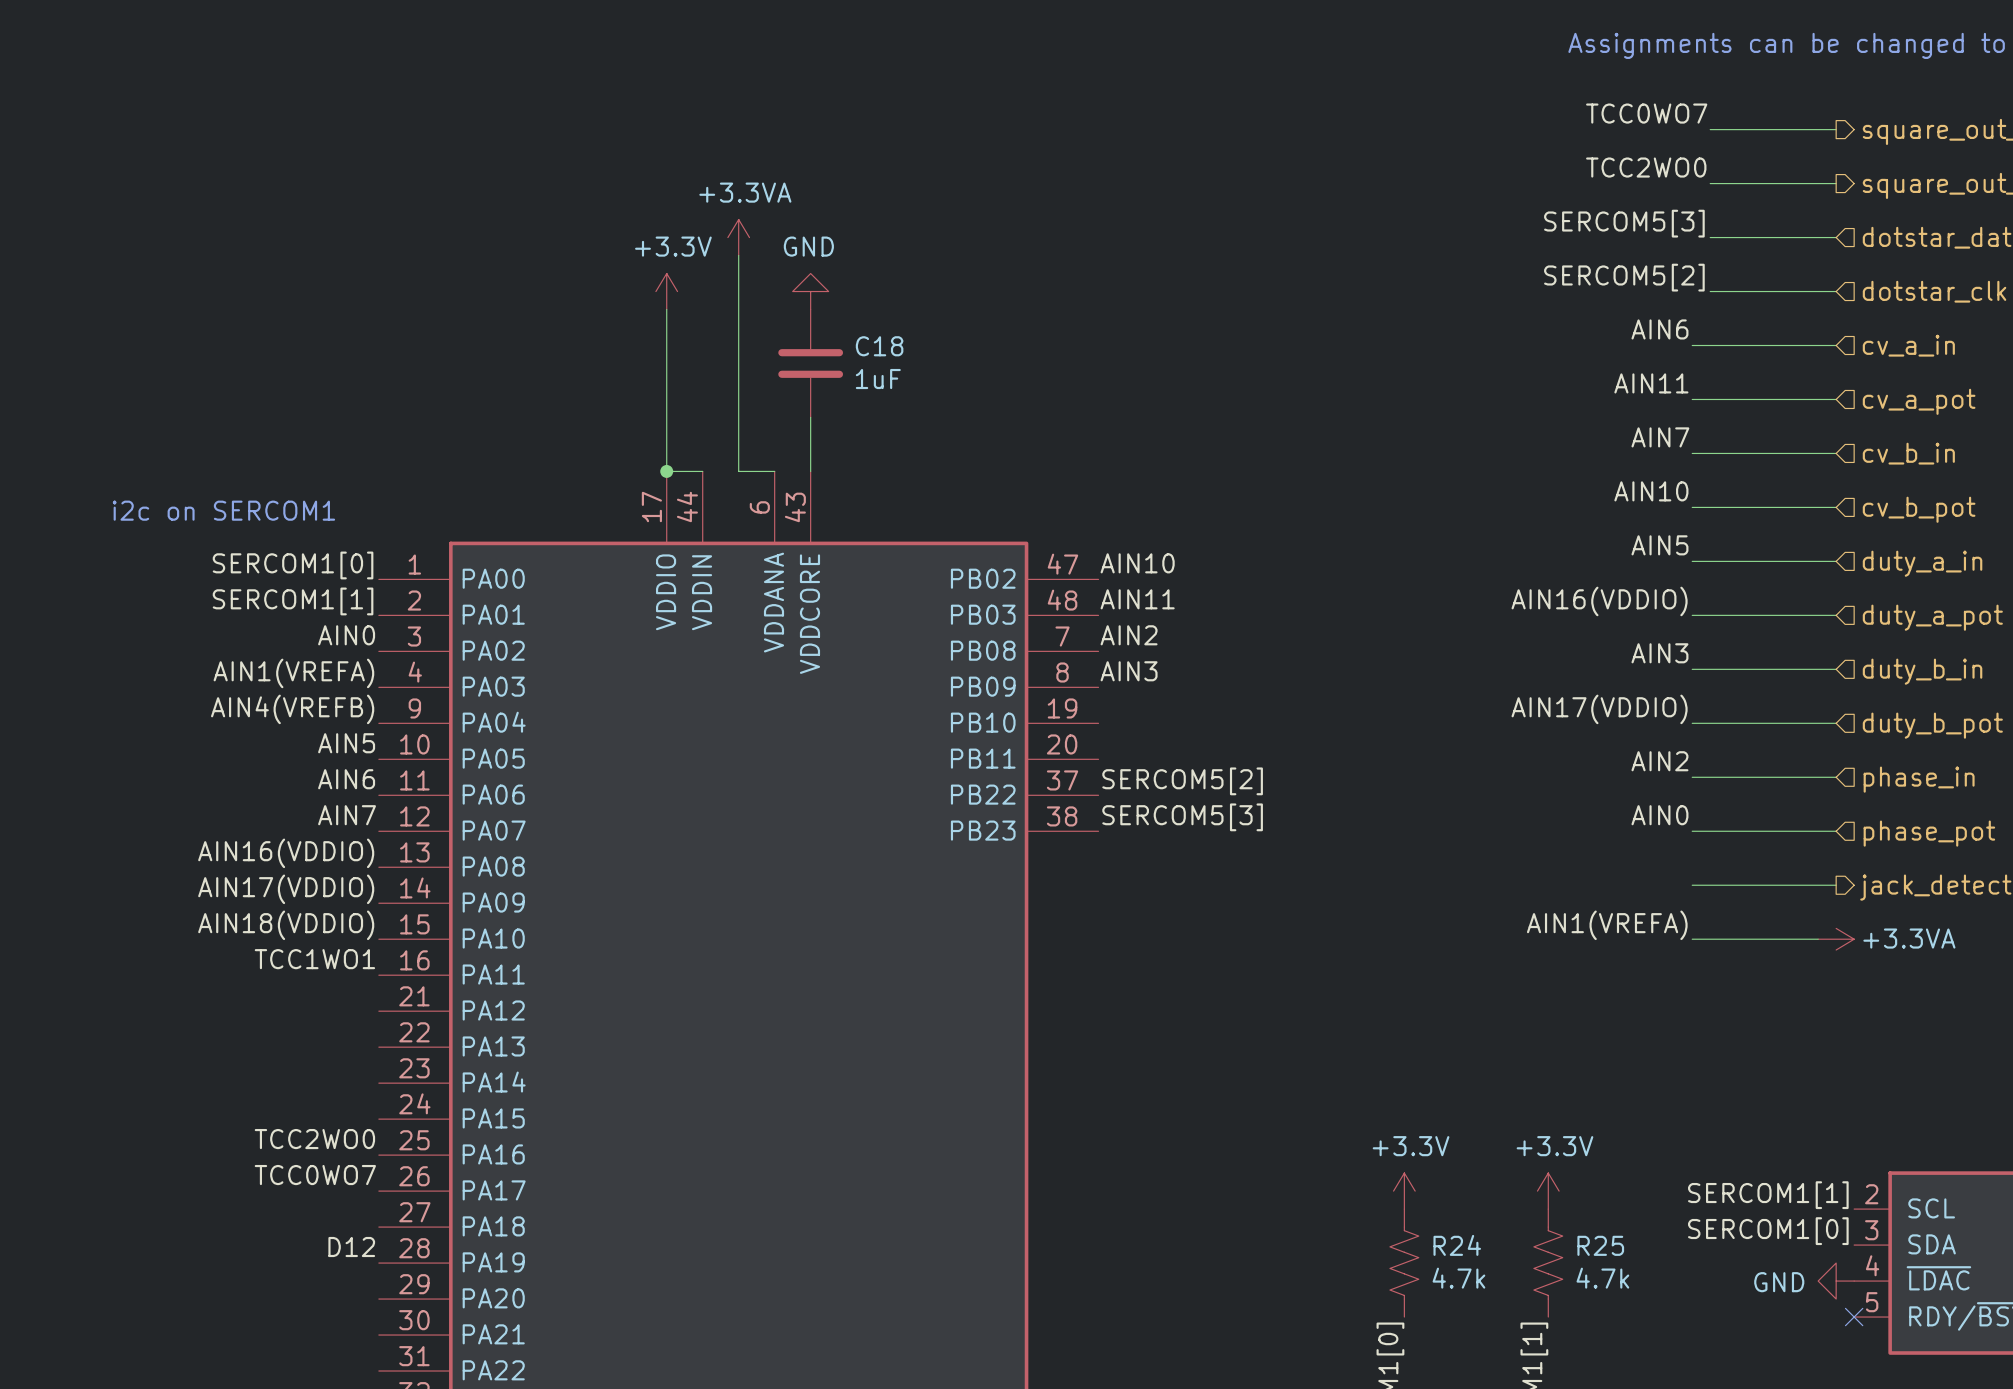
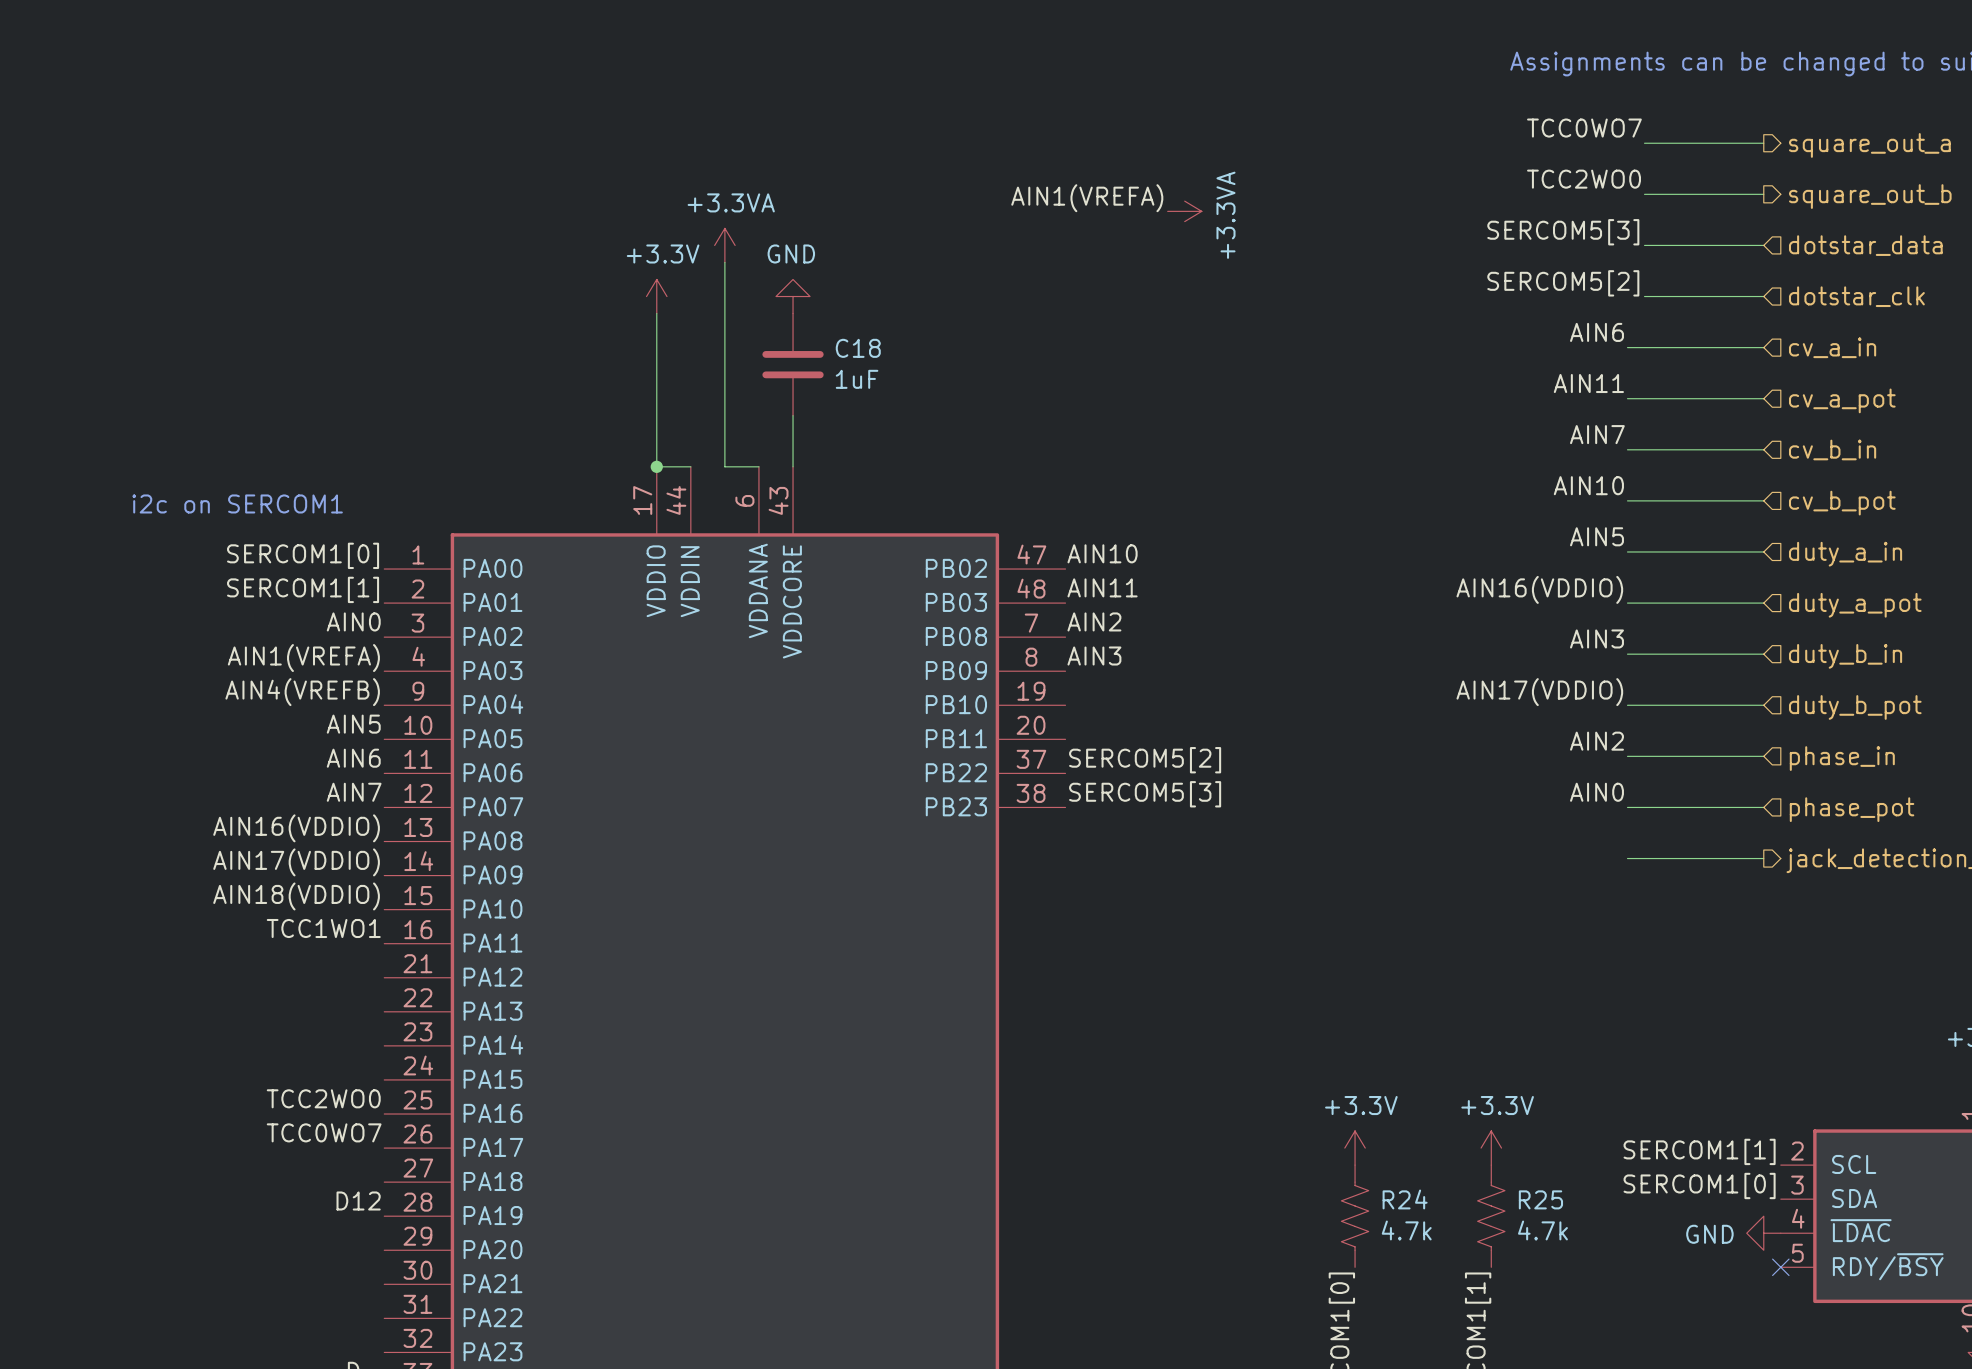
label: none -> AIN1(VREFA) (1087, 198)
power symbol: none -> +3.3VA (1184, 211)
label: AIN1(VREFA) (1607, 925) -> none
wire: (1692, 939) (1818, 939) -> none
power symbol: +3.3VA (1836, 939) -> none

